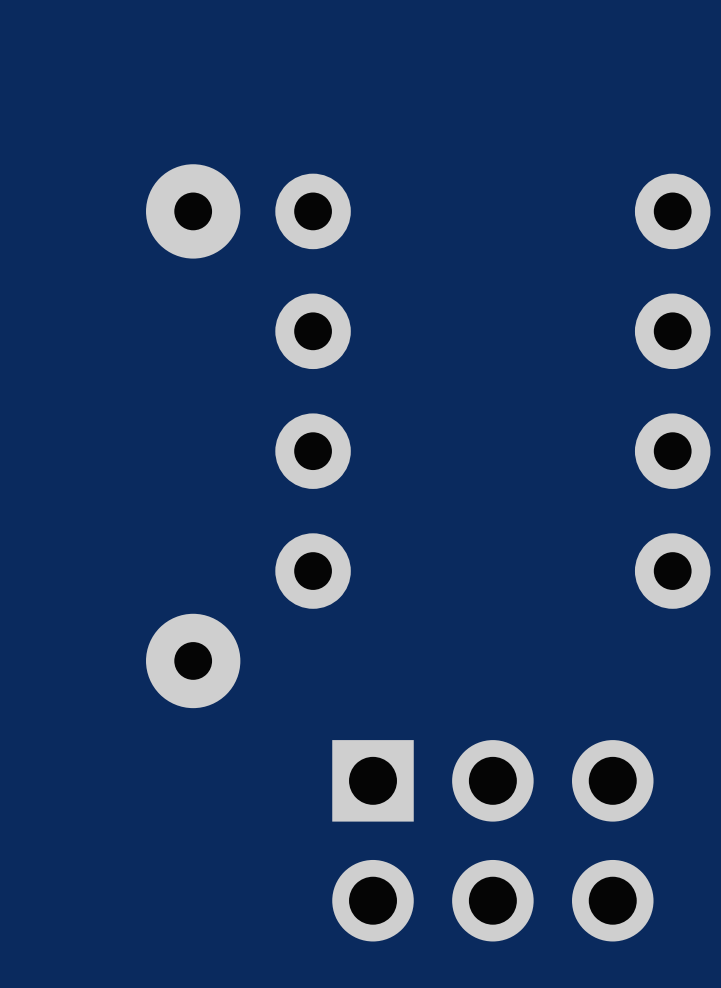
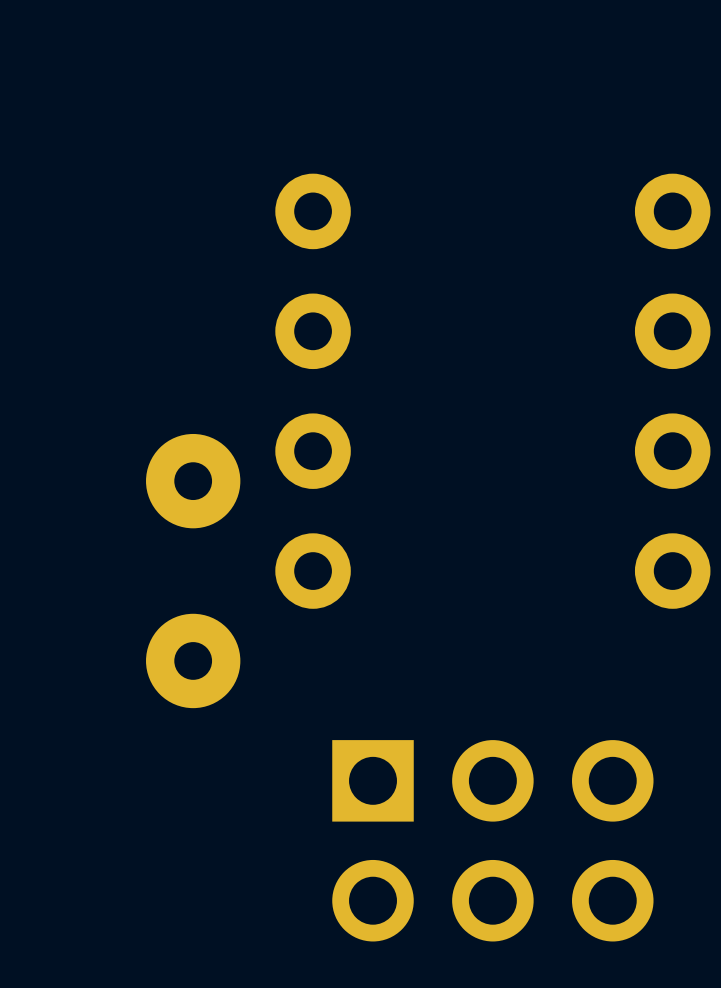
part: (193, 211) -> none
part: none -> (193, 571)

